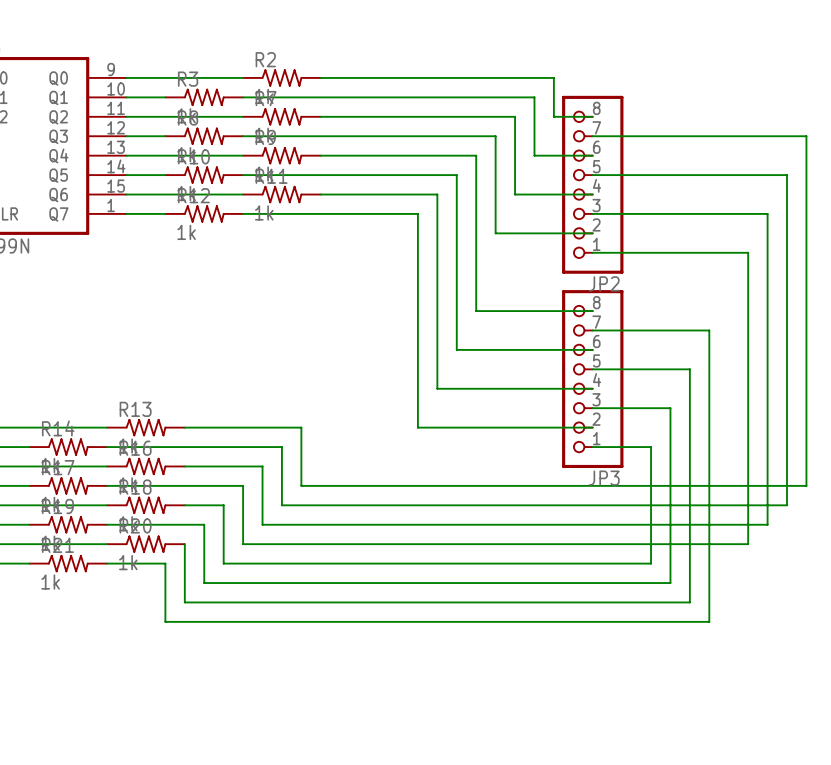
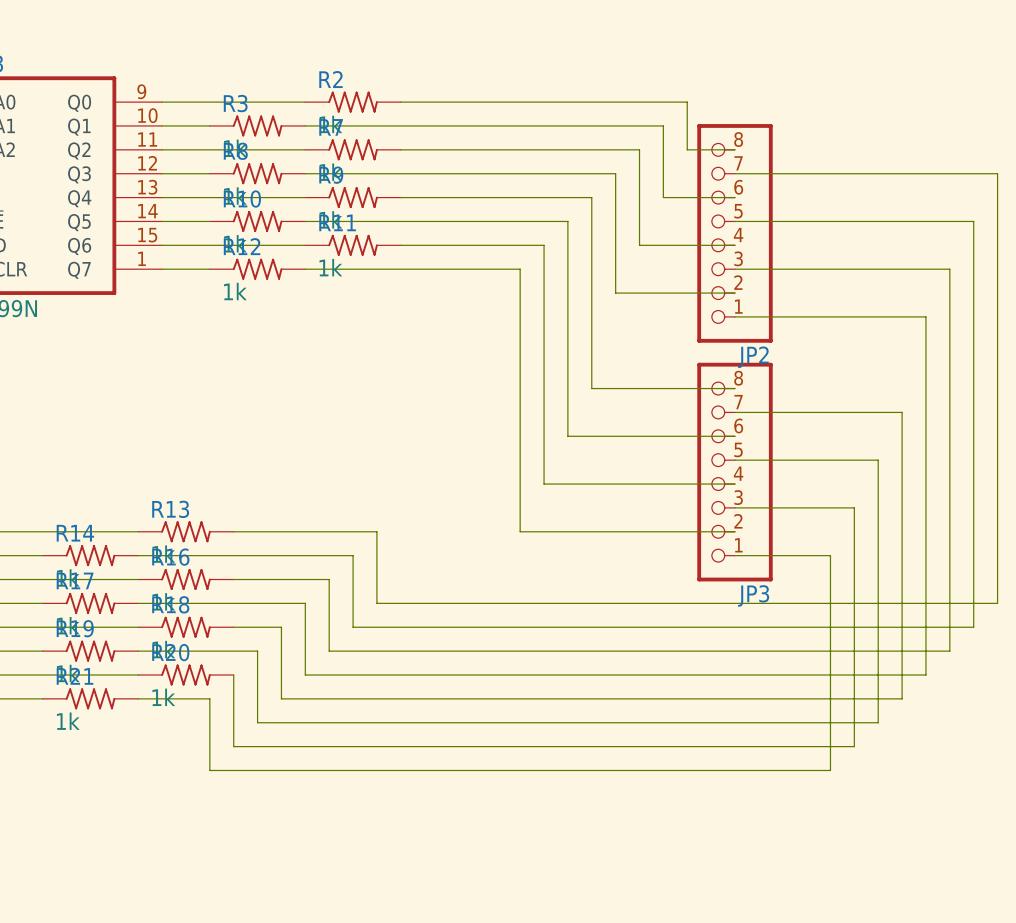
wire: (709, 330) (709, 369) -> (854, 460) (878, 460)
wire: (689, 369) (689, 408) -> (830, 507) (854, 507)
wire: (670, 408) (670, 447) -> (806, 555) (830, 555)
wire: (651, 447) (651, 563) -> (878, 412) (902, 412) (902, 698) (806, 698)
wire: (709, 583) (709, 621) (670, 621) -> (878, 722) (830, 722) (830, 770)

